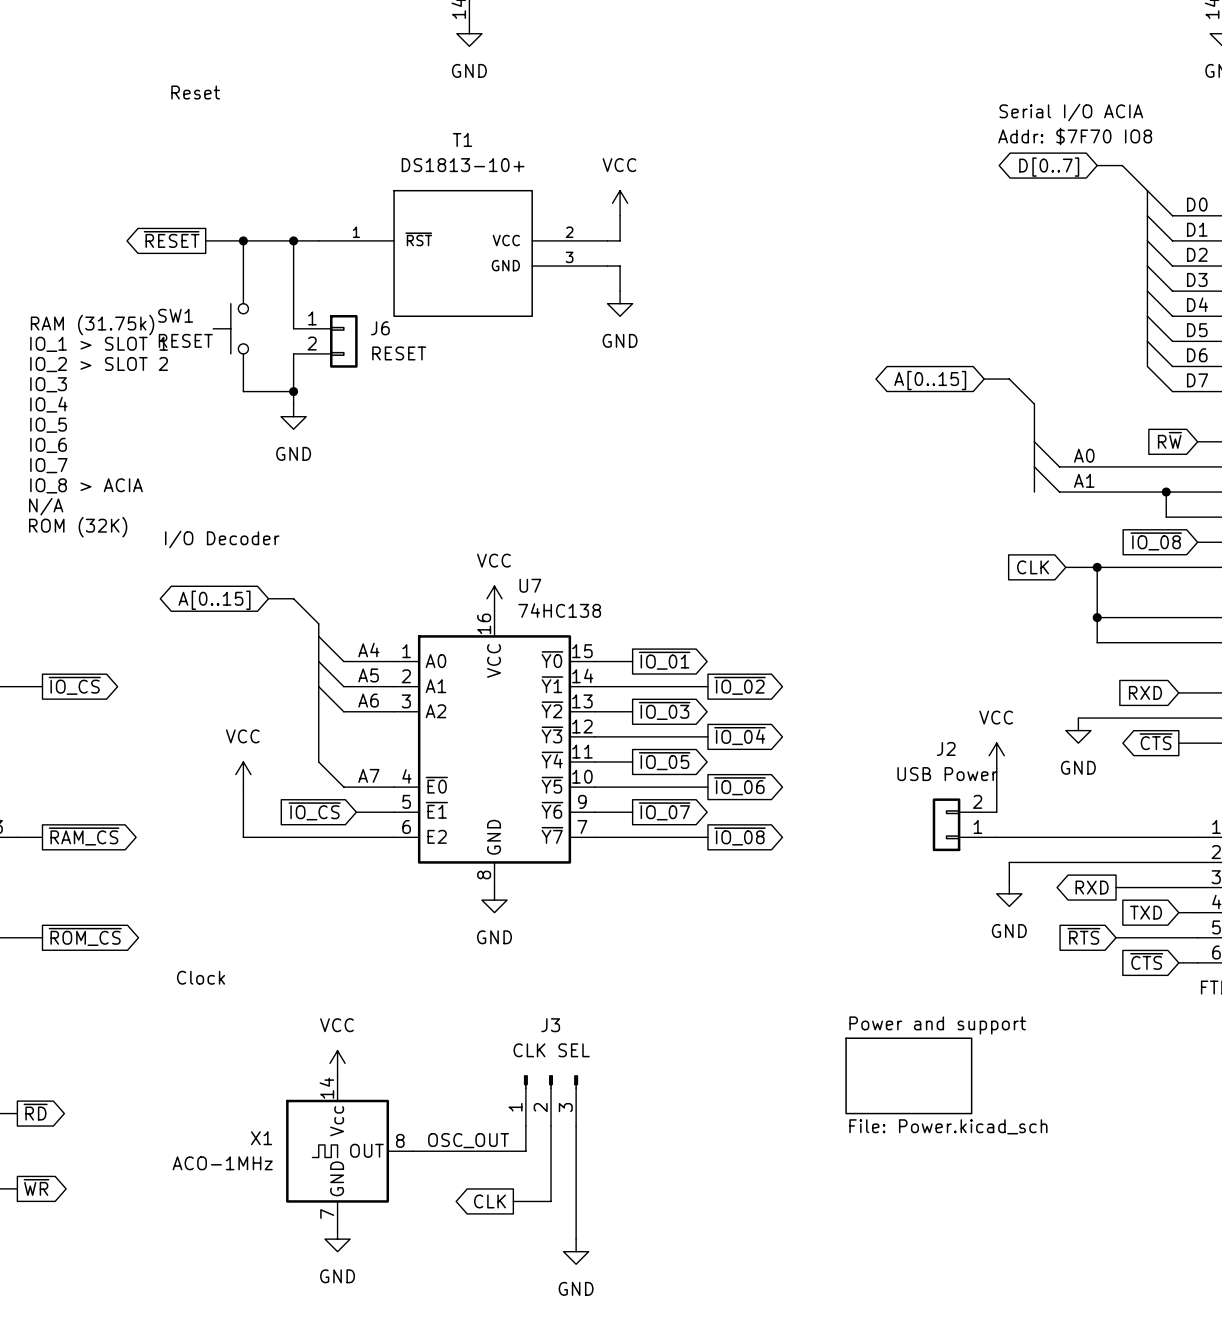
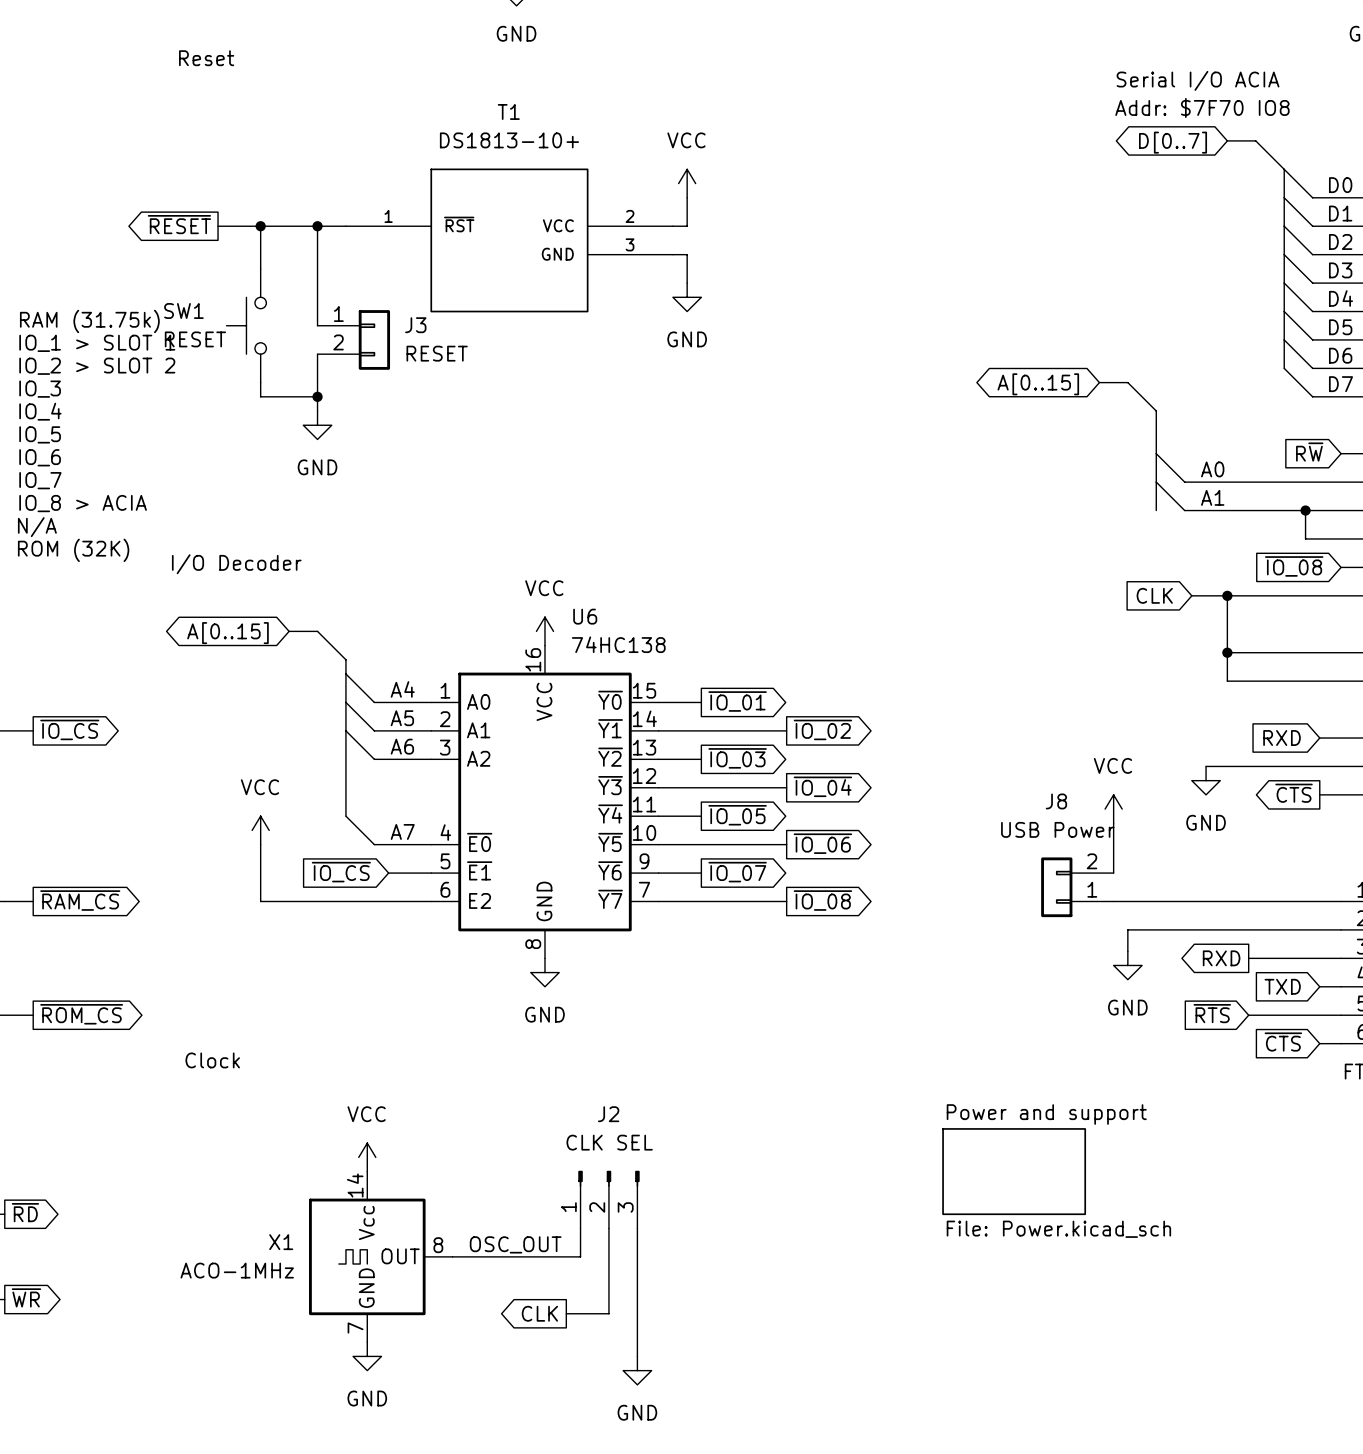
J6 name: J6 (380, 328) -> J3 (415, 325)
U7 name: U7 (530, 585) -> U6 (585, 616)
J2 name: J2 (946, 748) -> J8 (1056, 801)
J3 name: J3 (550, 1025) -> J2 (608, 1114)

